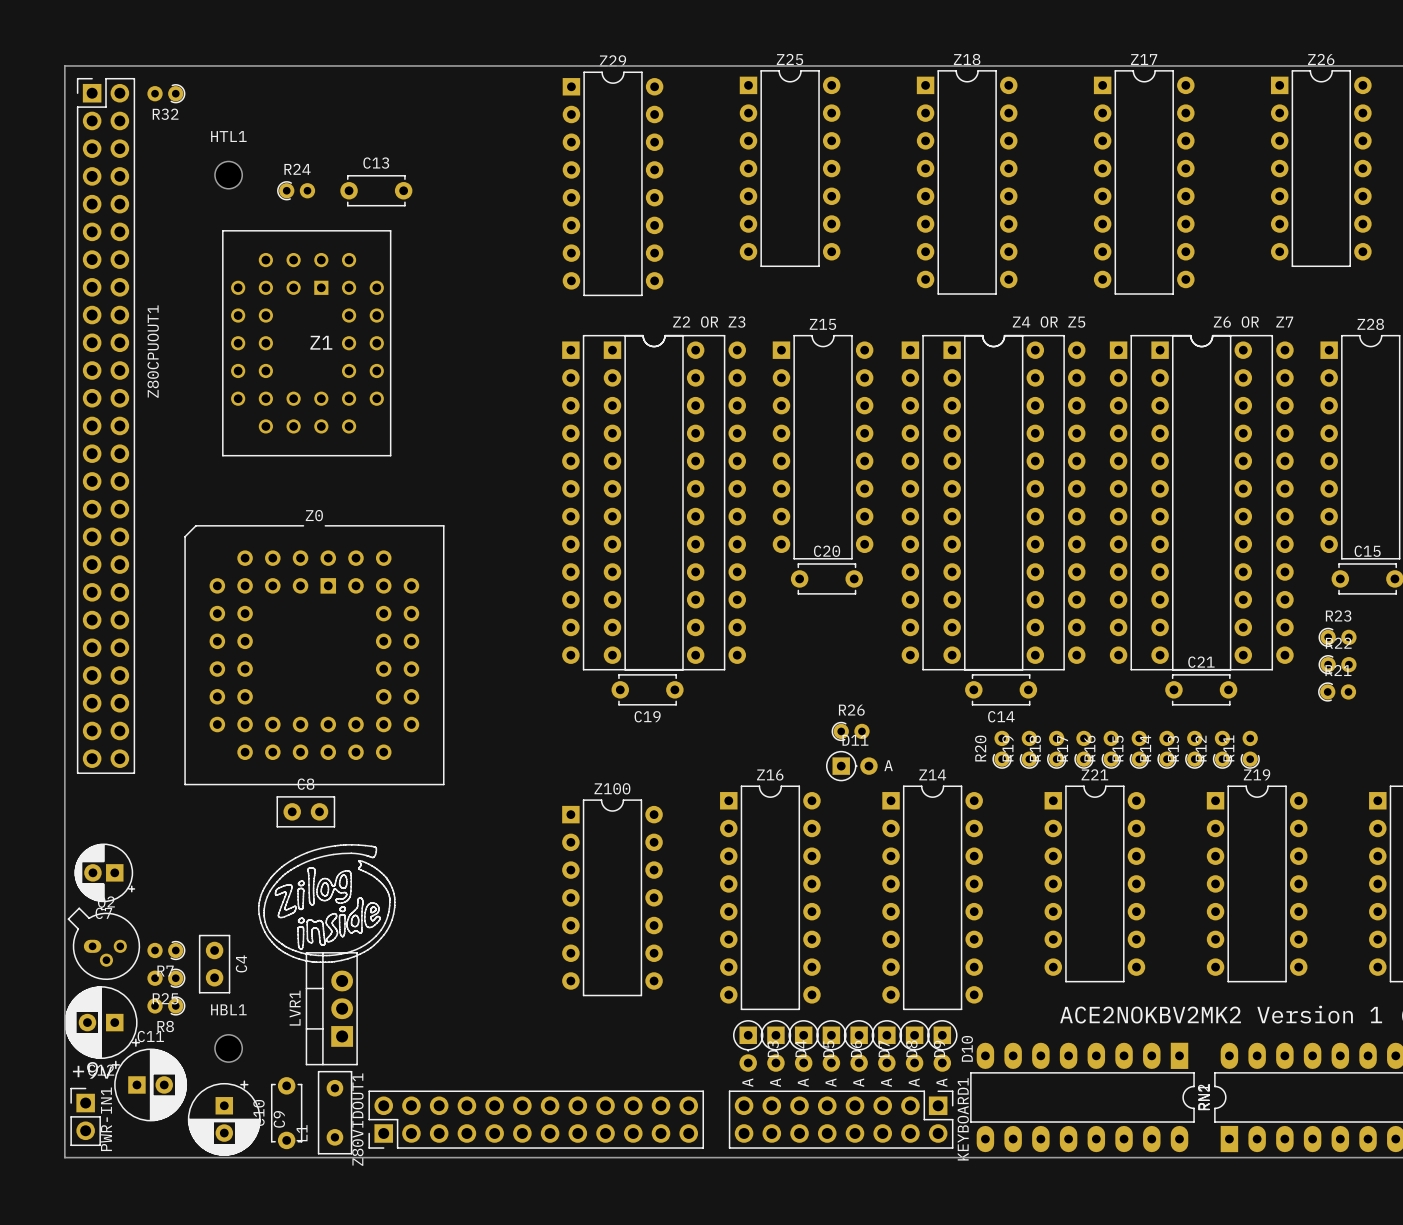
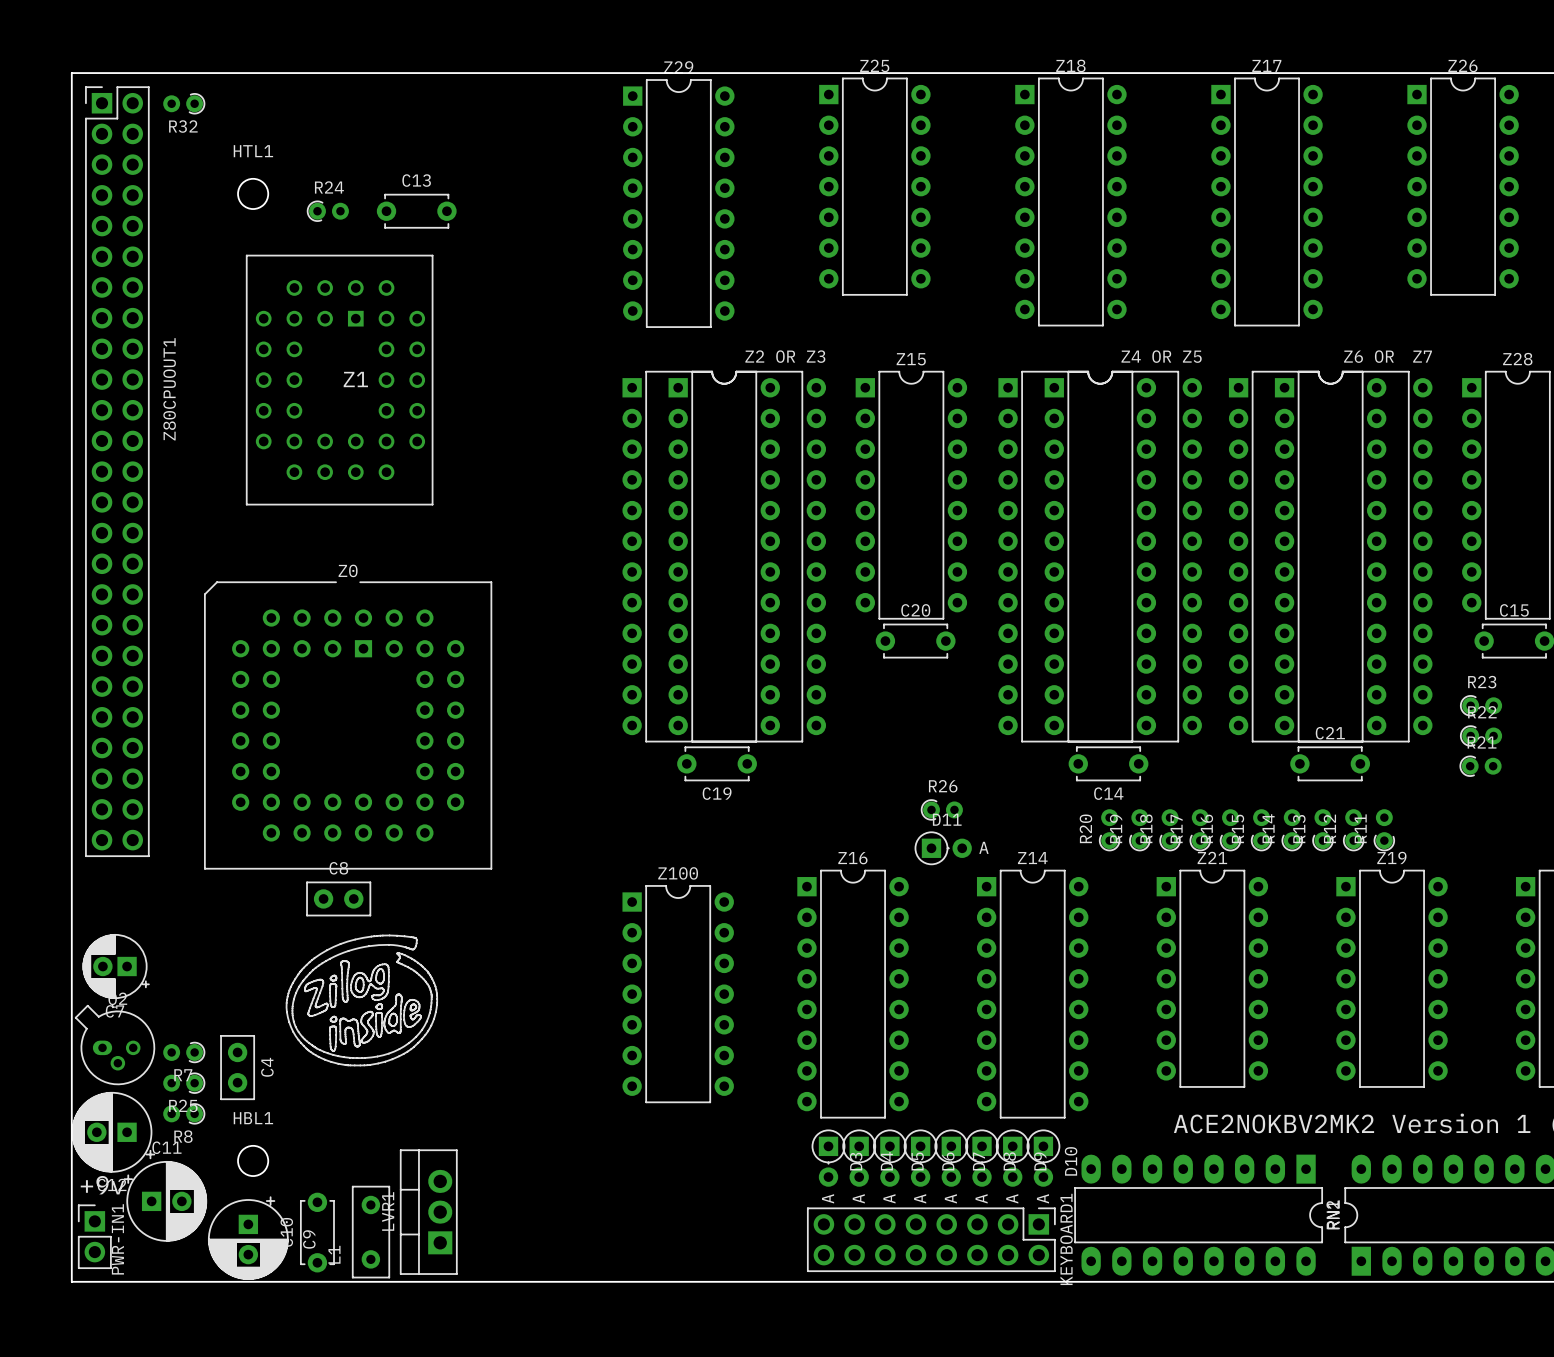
LVR1 position: (331, 1008) -> (428, 1212)
Z80VIDOUT1: (536, 1119) -> none

